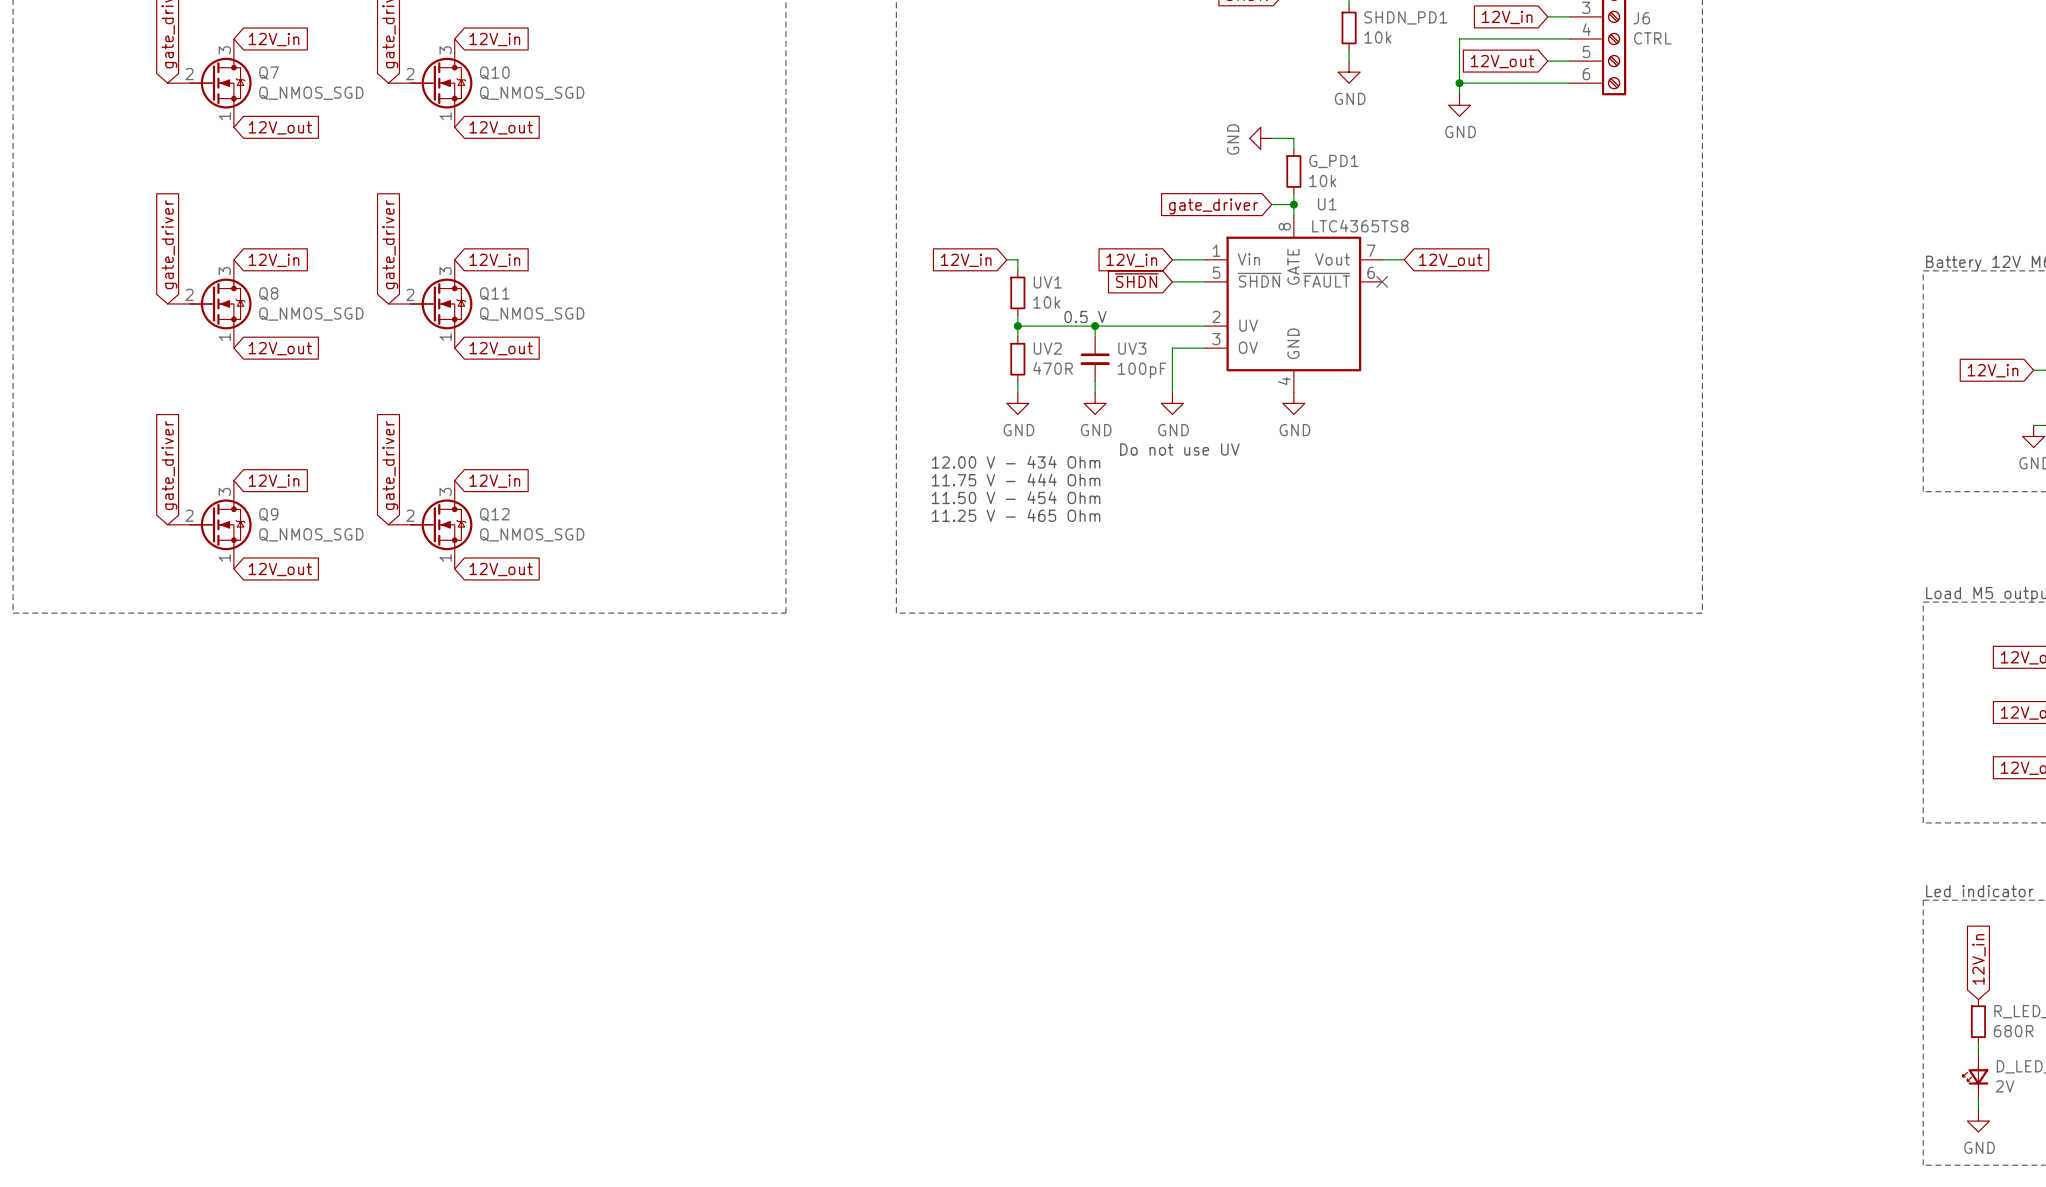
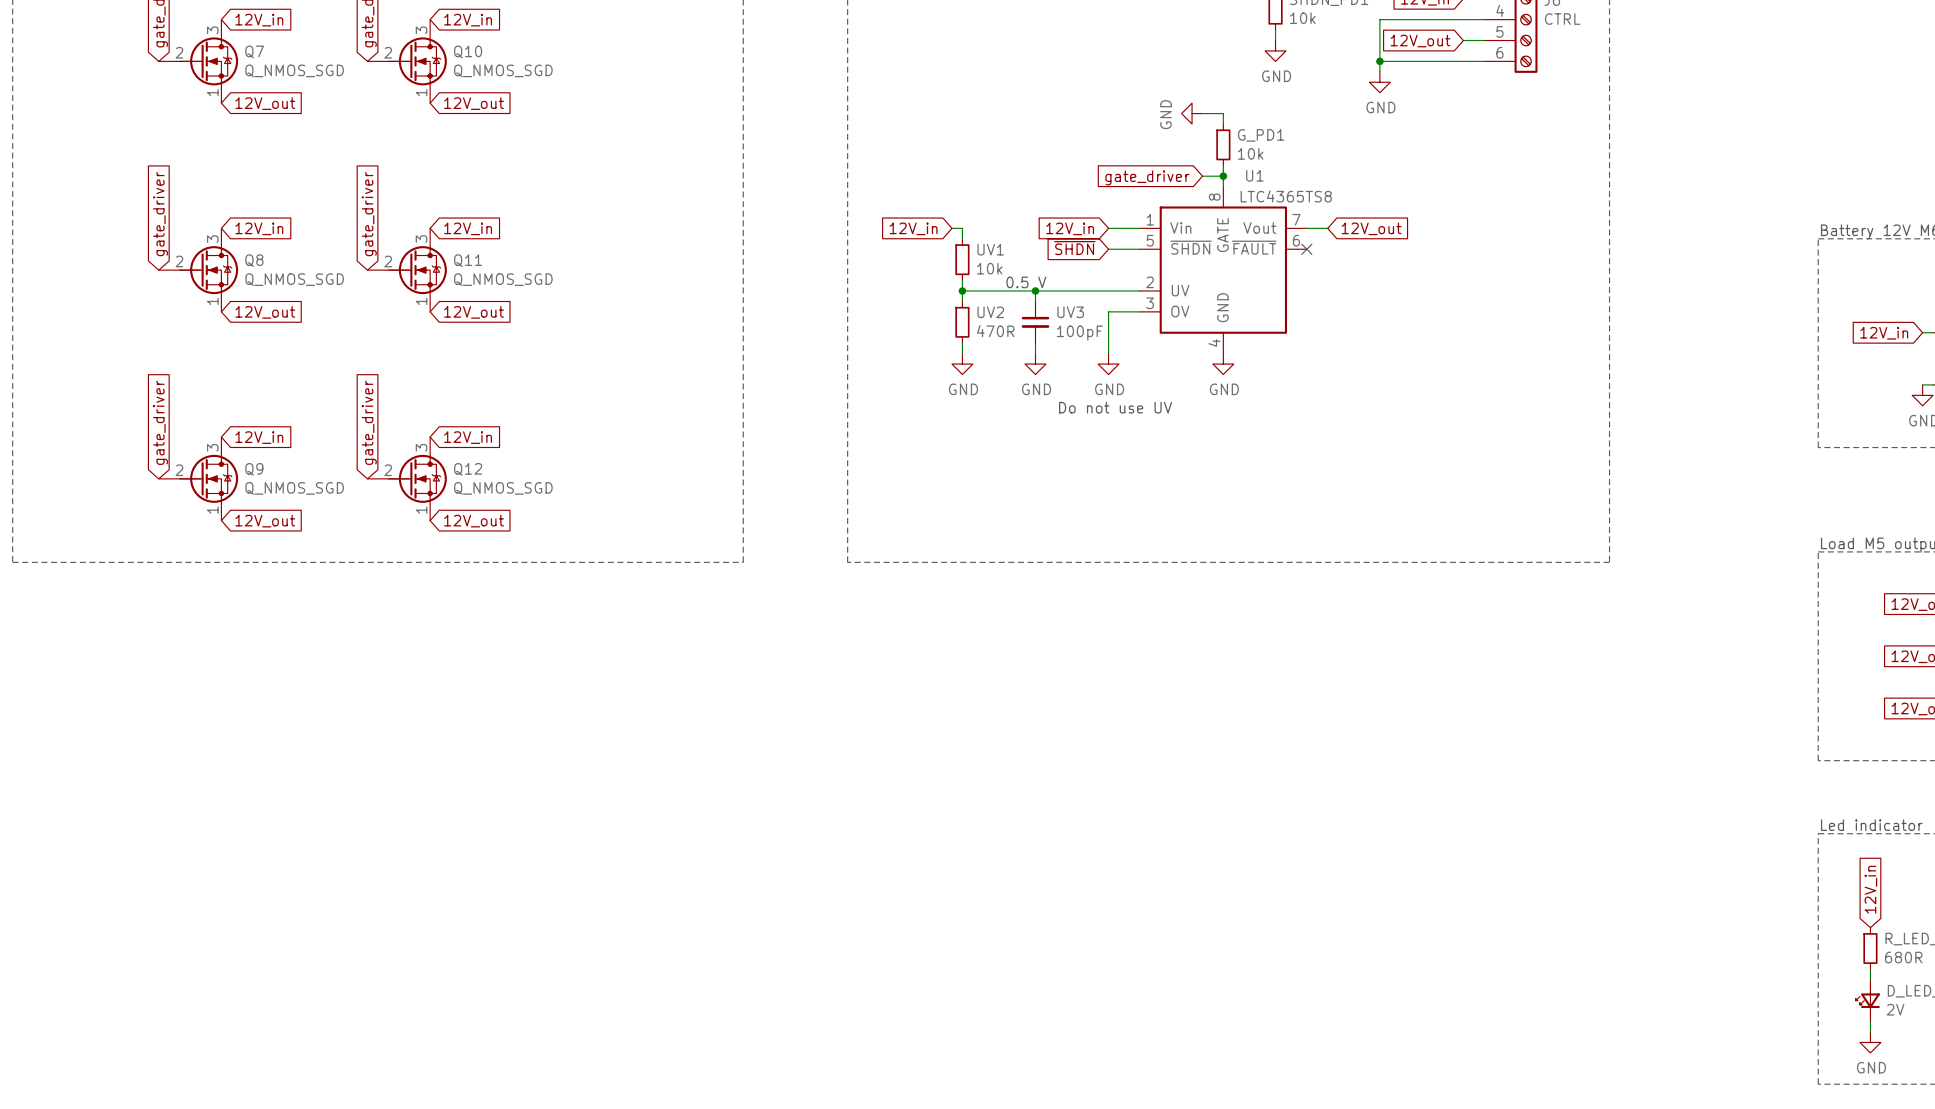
text: 12.00 V - 434 Ohm (1016, 462) -> none
text: 11.75 V - 444 Ohm (1016, 479) -> none
text: 11.50 V - 454 Ohm (1016, 497) -> none
text: 11.25 V - 465 Ohm (1016, 515) -> none

